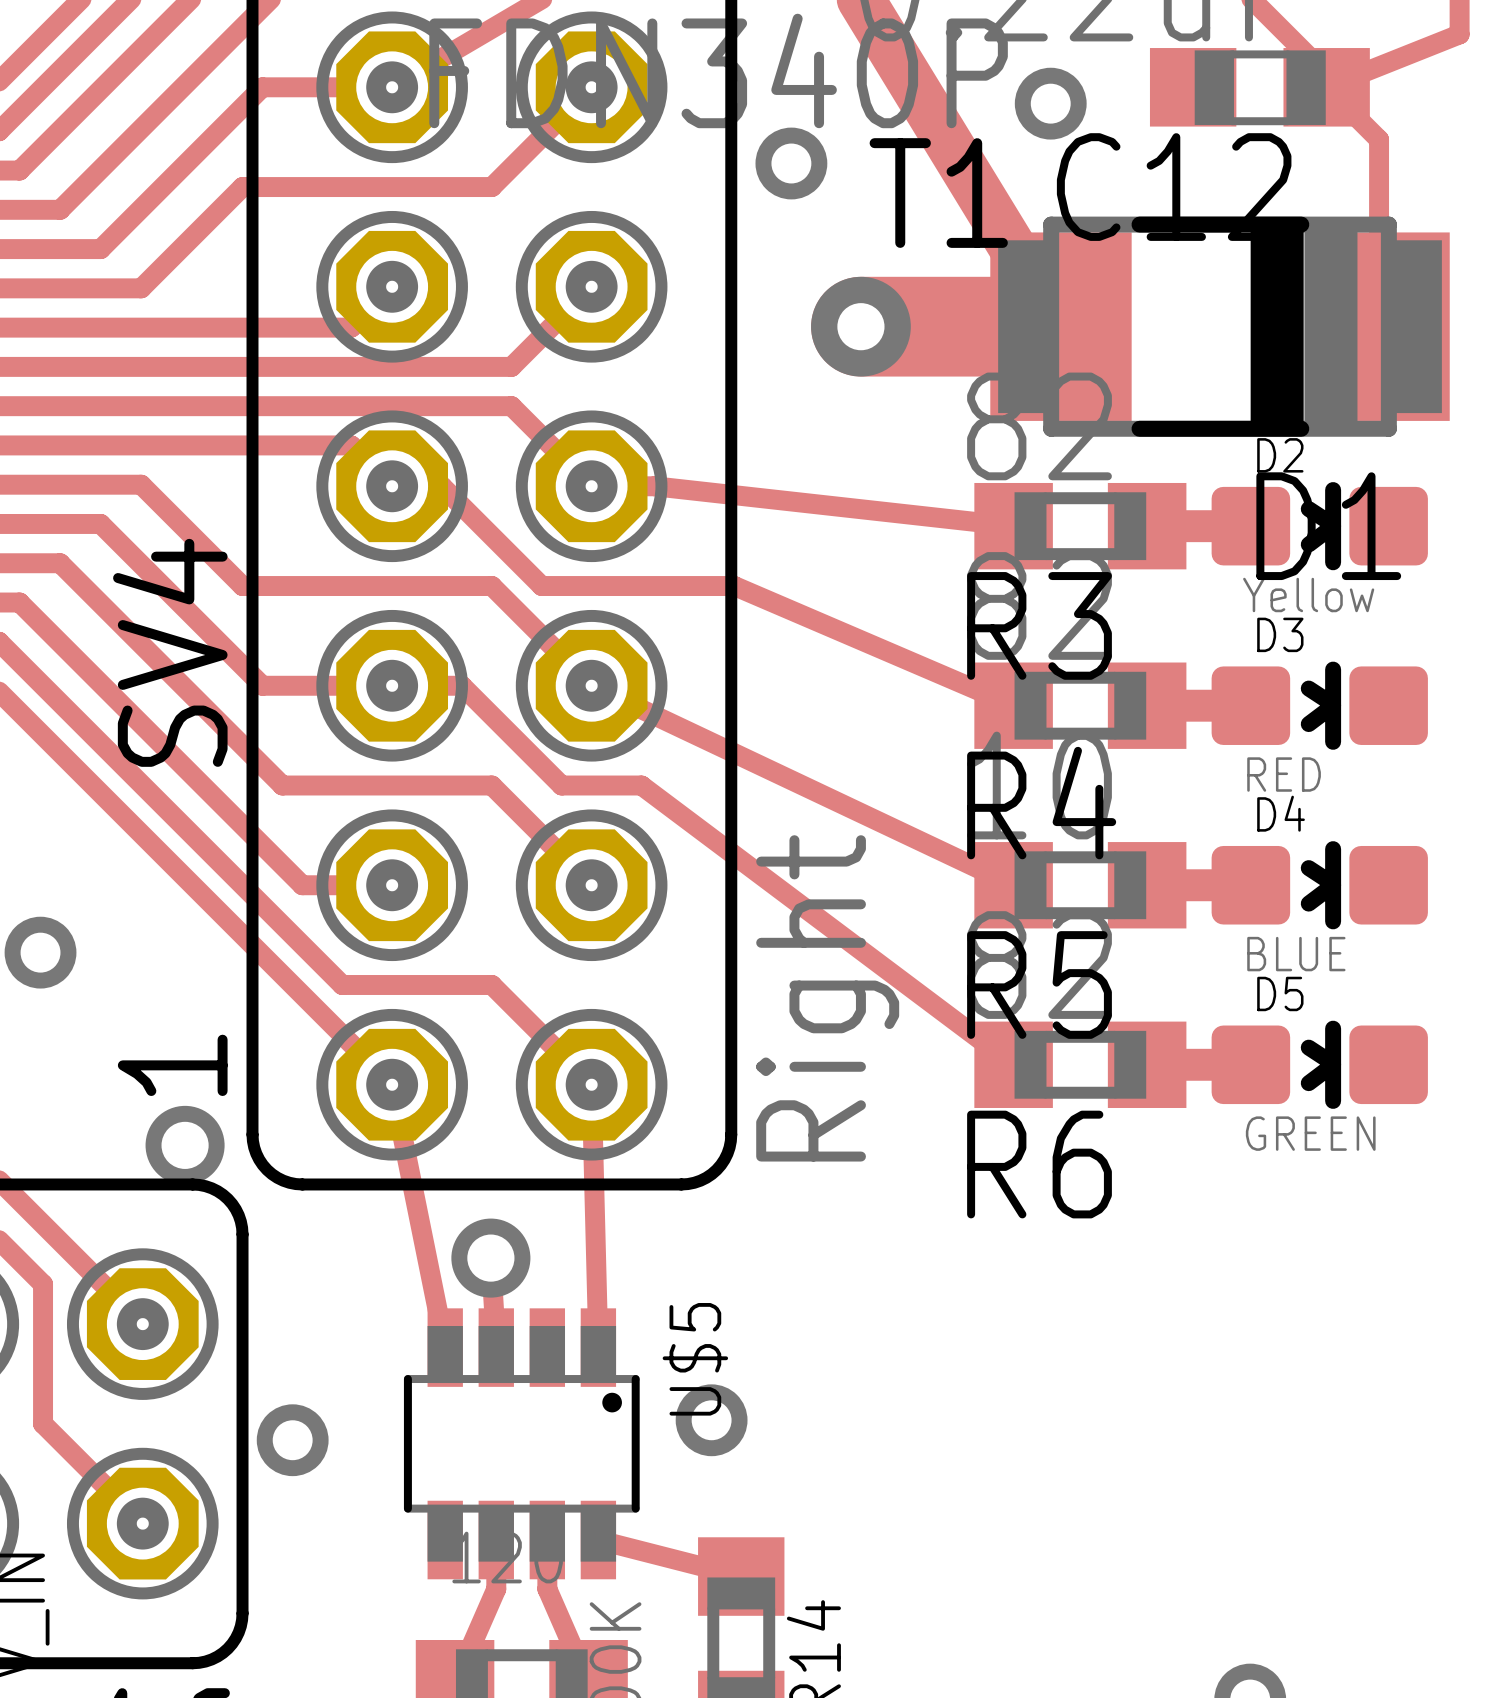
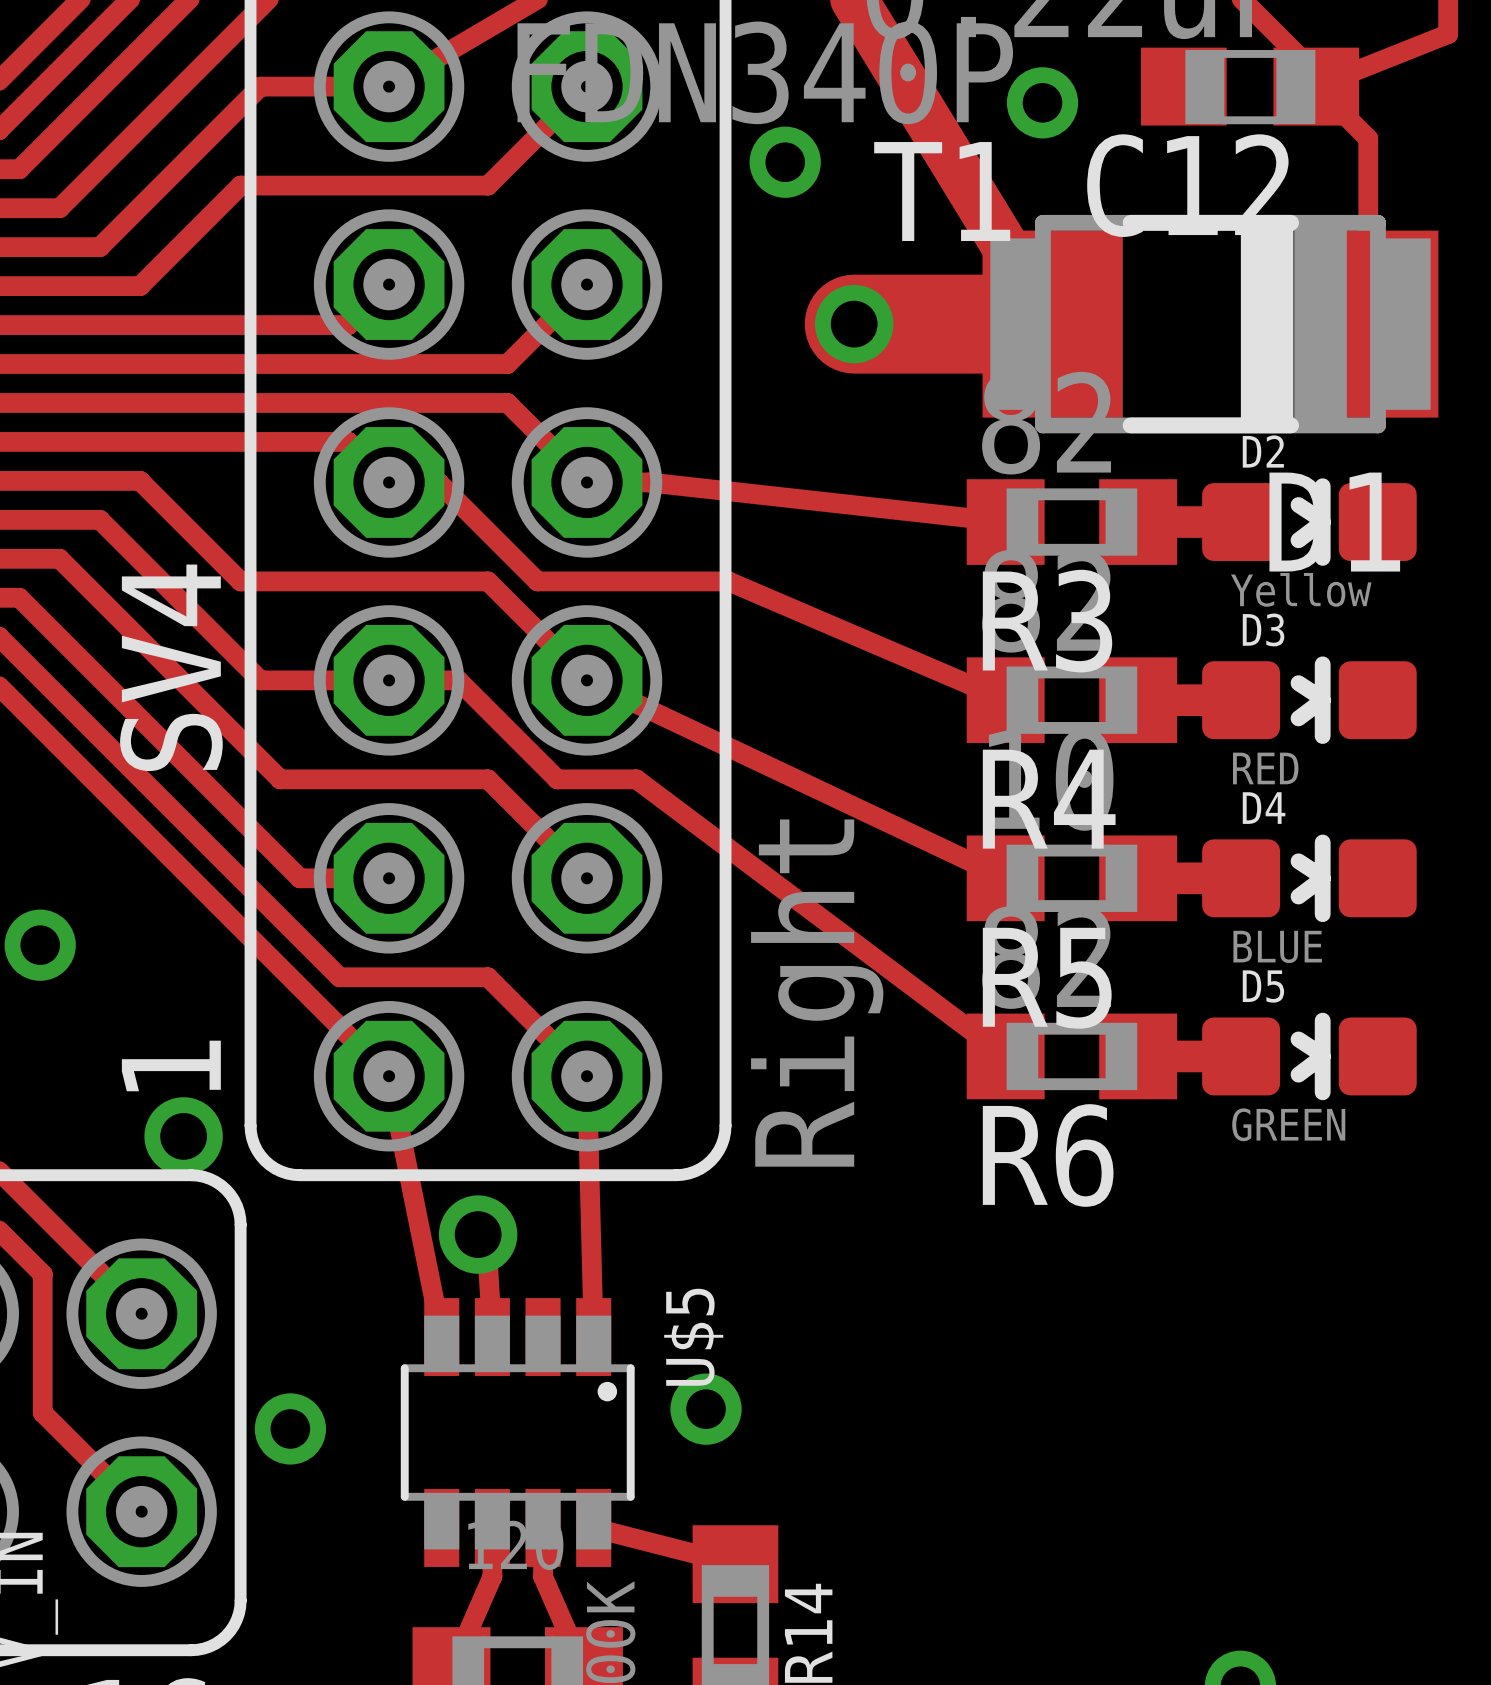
via size: [811, 276, 911, 377] -> [814, 284, 894, 364]
via position: (490, 1258) -> (478, 1234)

